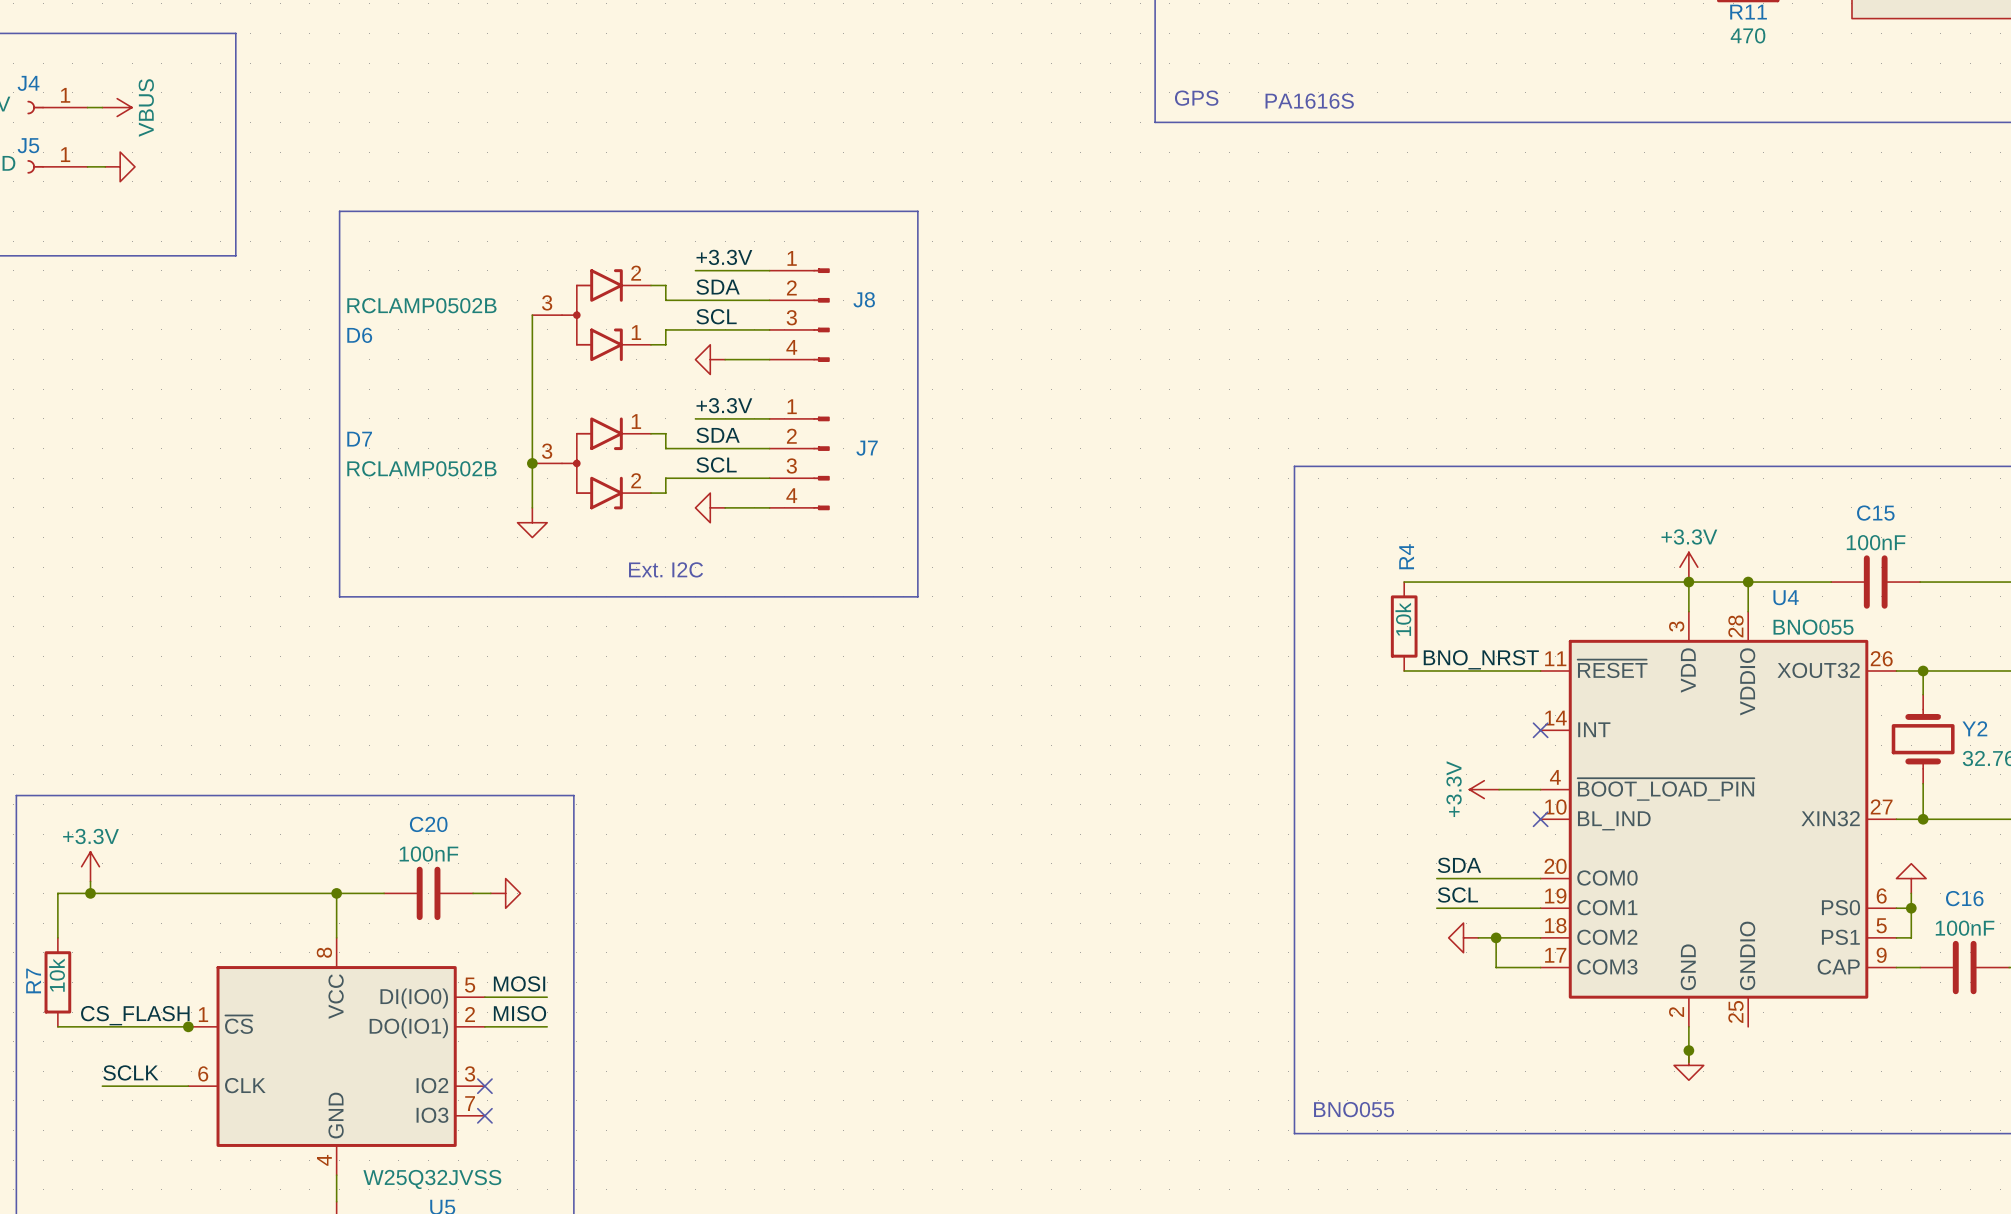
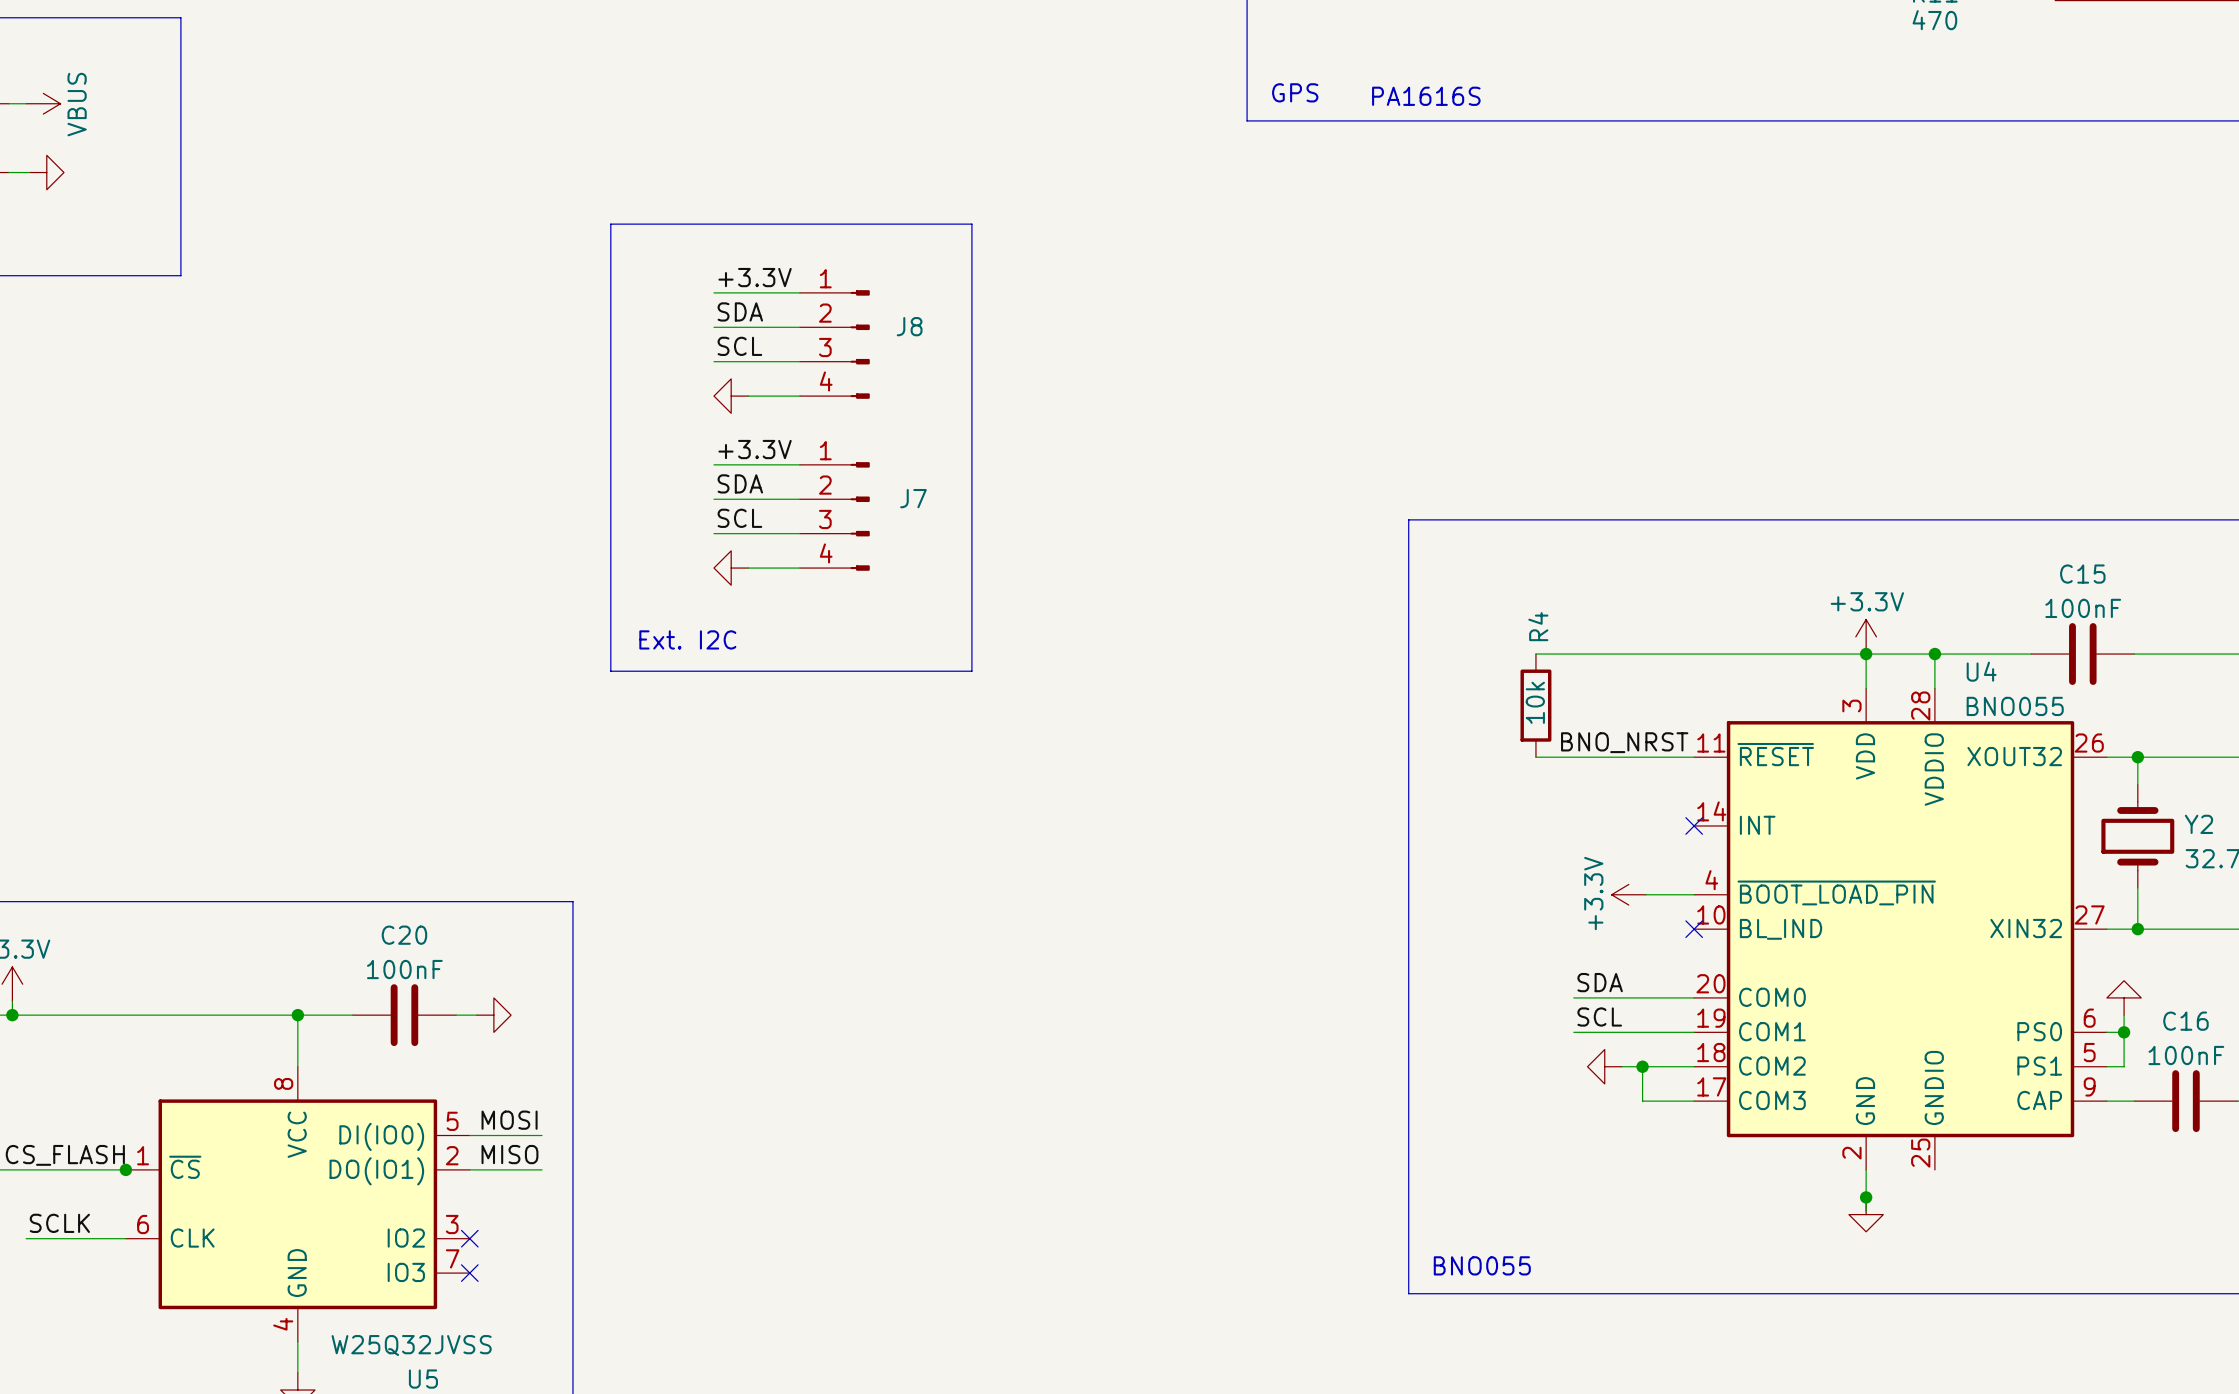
line: (606, 211) (339, 211) (339, 596) (606, 596) -> (610, 224) (610, 671)
wire: (650, 285) (665, 285) (665, 300) (695, 300) -> none
wire: (532, 315) (532, 507) -> none
D6: RCLAMP0502B (591, 315) -> none
wire: (695, 329) (665, 329) (665, 344) (650, 344) -> none
wire: (650, 433) (665, 433) (665, 448) (695, 448) -> none
junction: (532, 463) -> none
D7: RCLAMP0502B (591, 463) -> none
wire: (695, 478) (665, 478) (665, 493) (650, 493) -> none
power symbol: (532, 522) -> none

